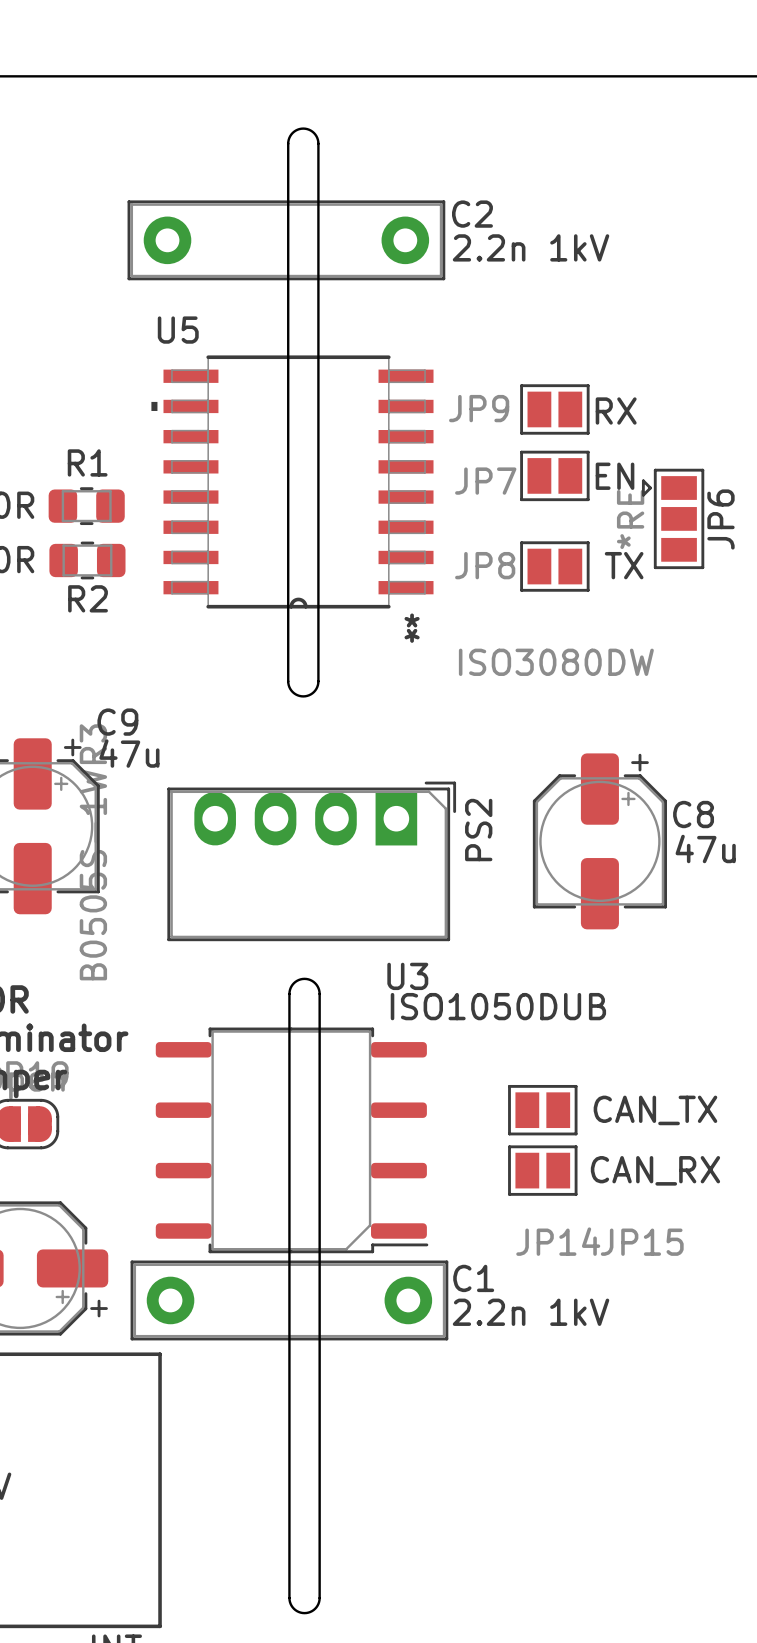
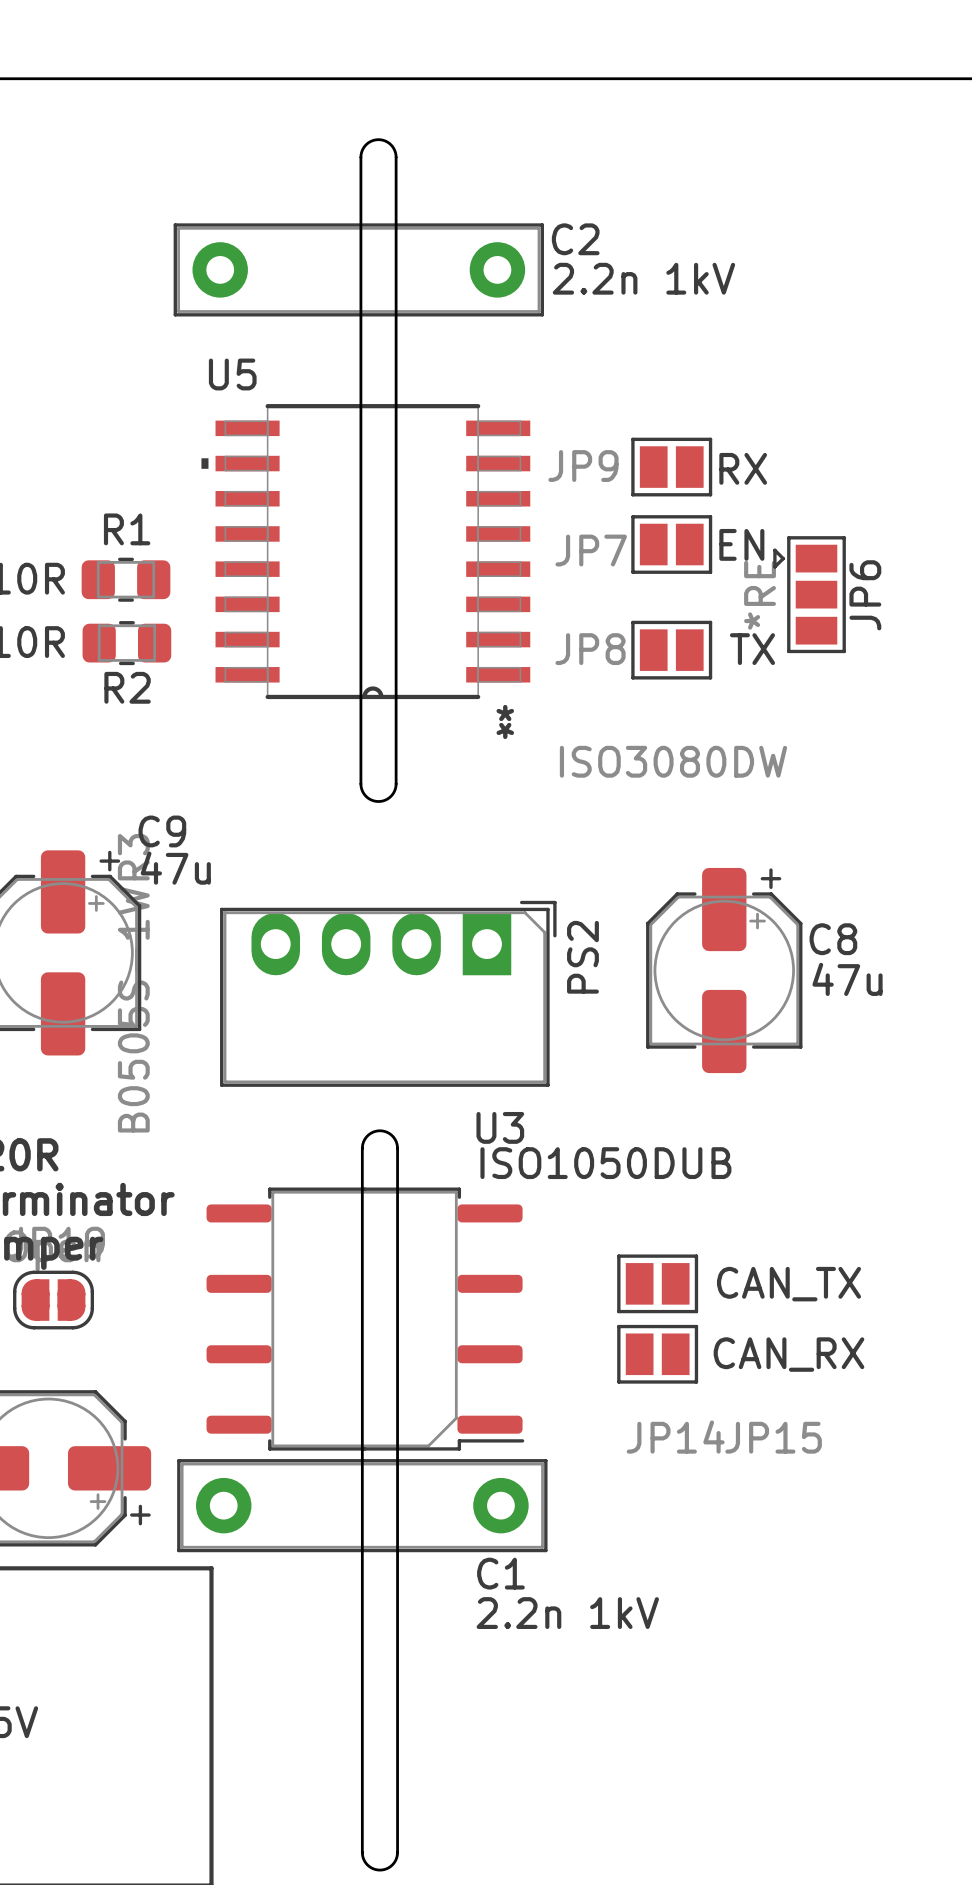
C1 name position: C1 (473, 1278) -> C1 (500, 1573)
C1 value position: 2.2n 1kV (531, 1312) -> 2.2n 1kV (567, 1613)

